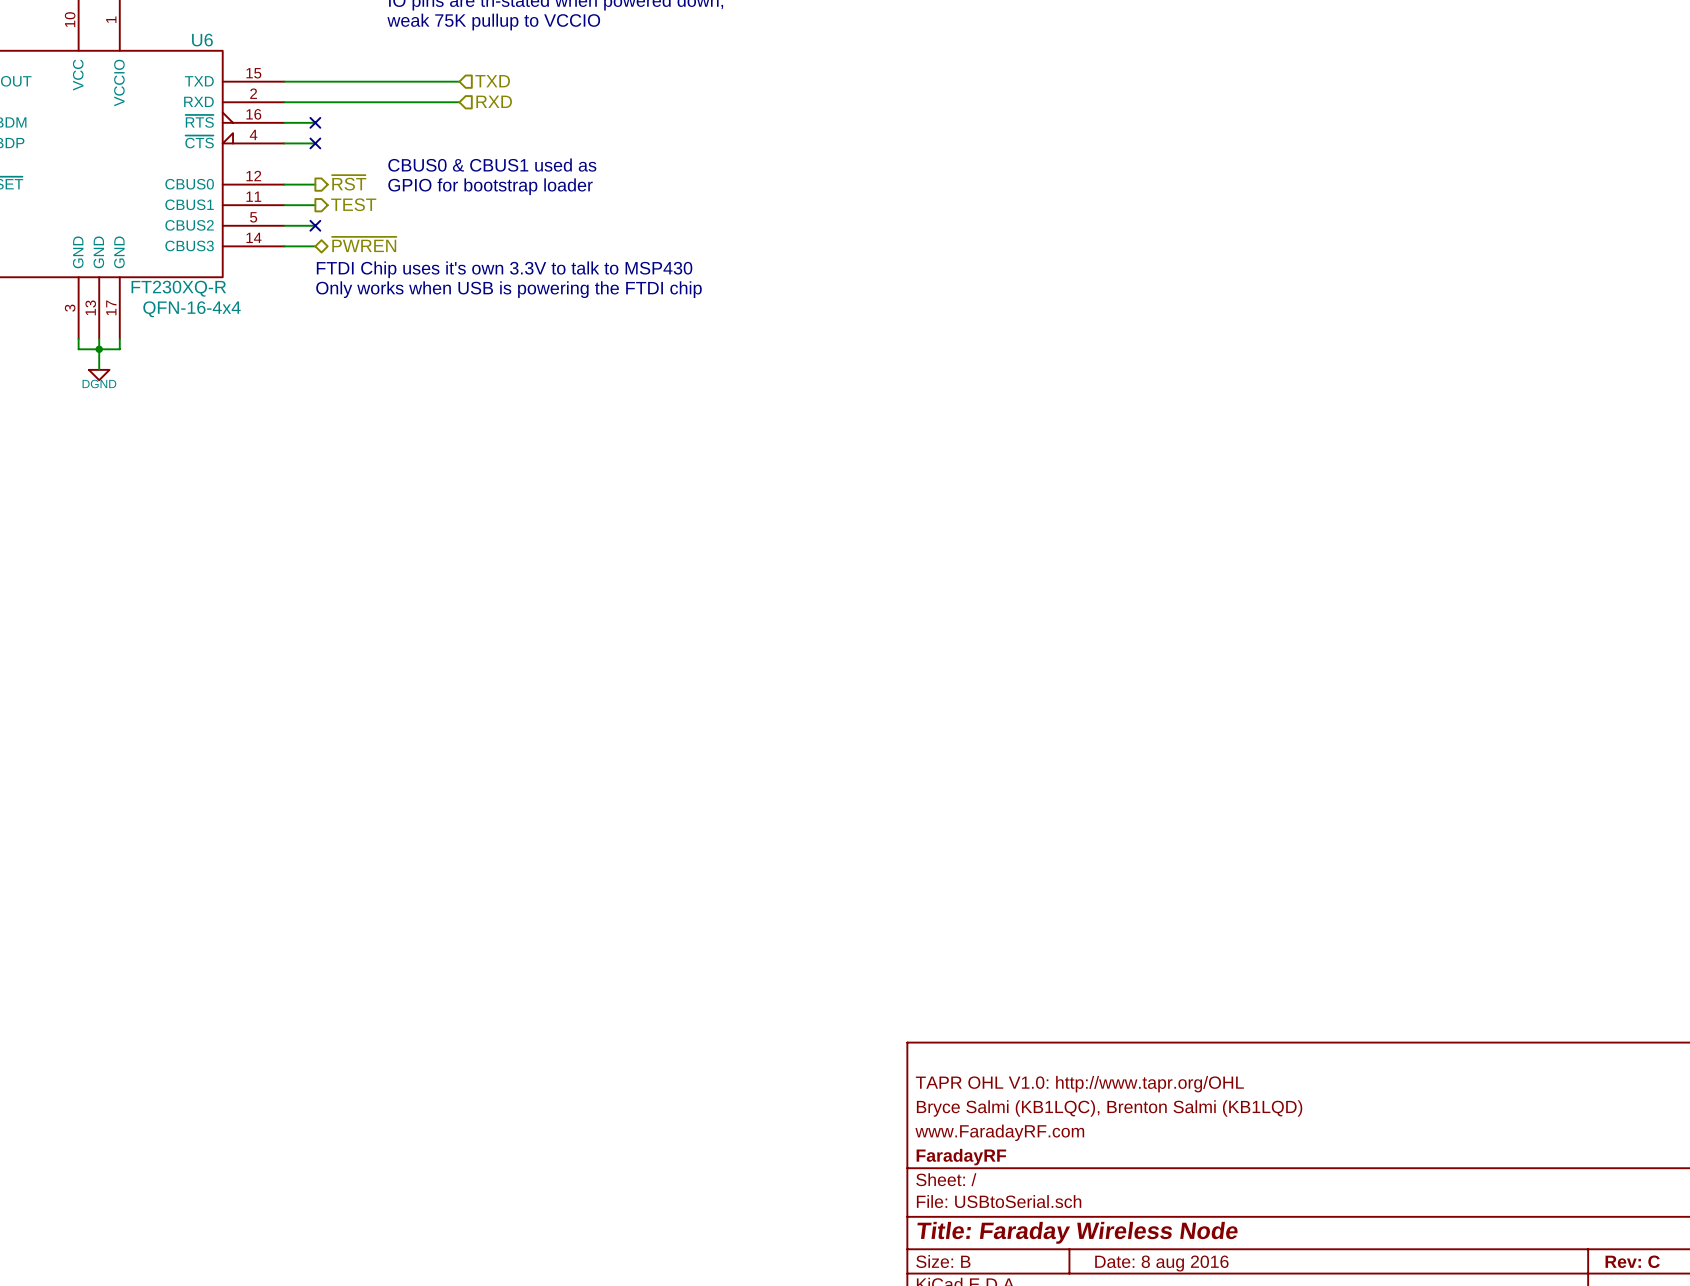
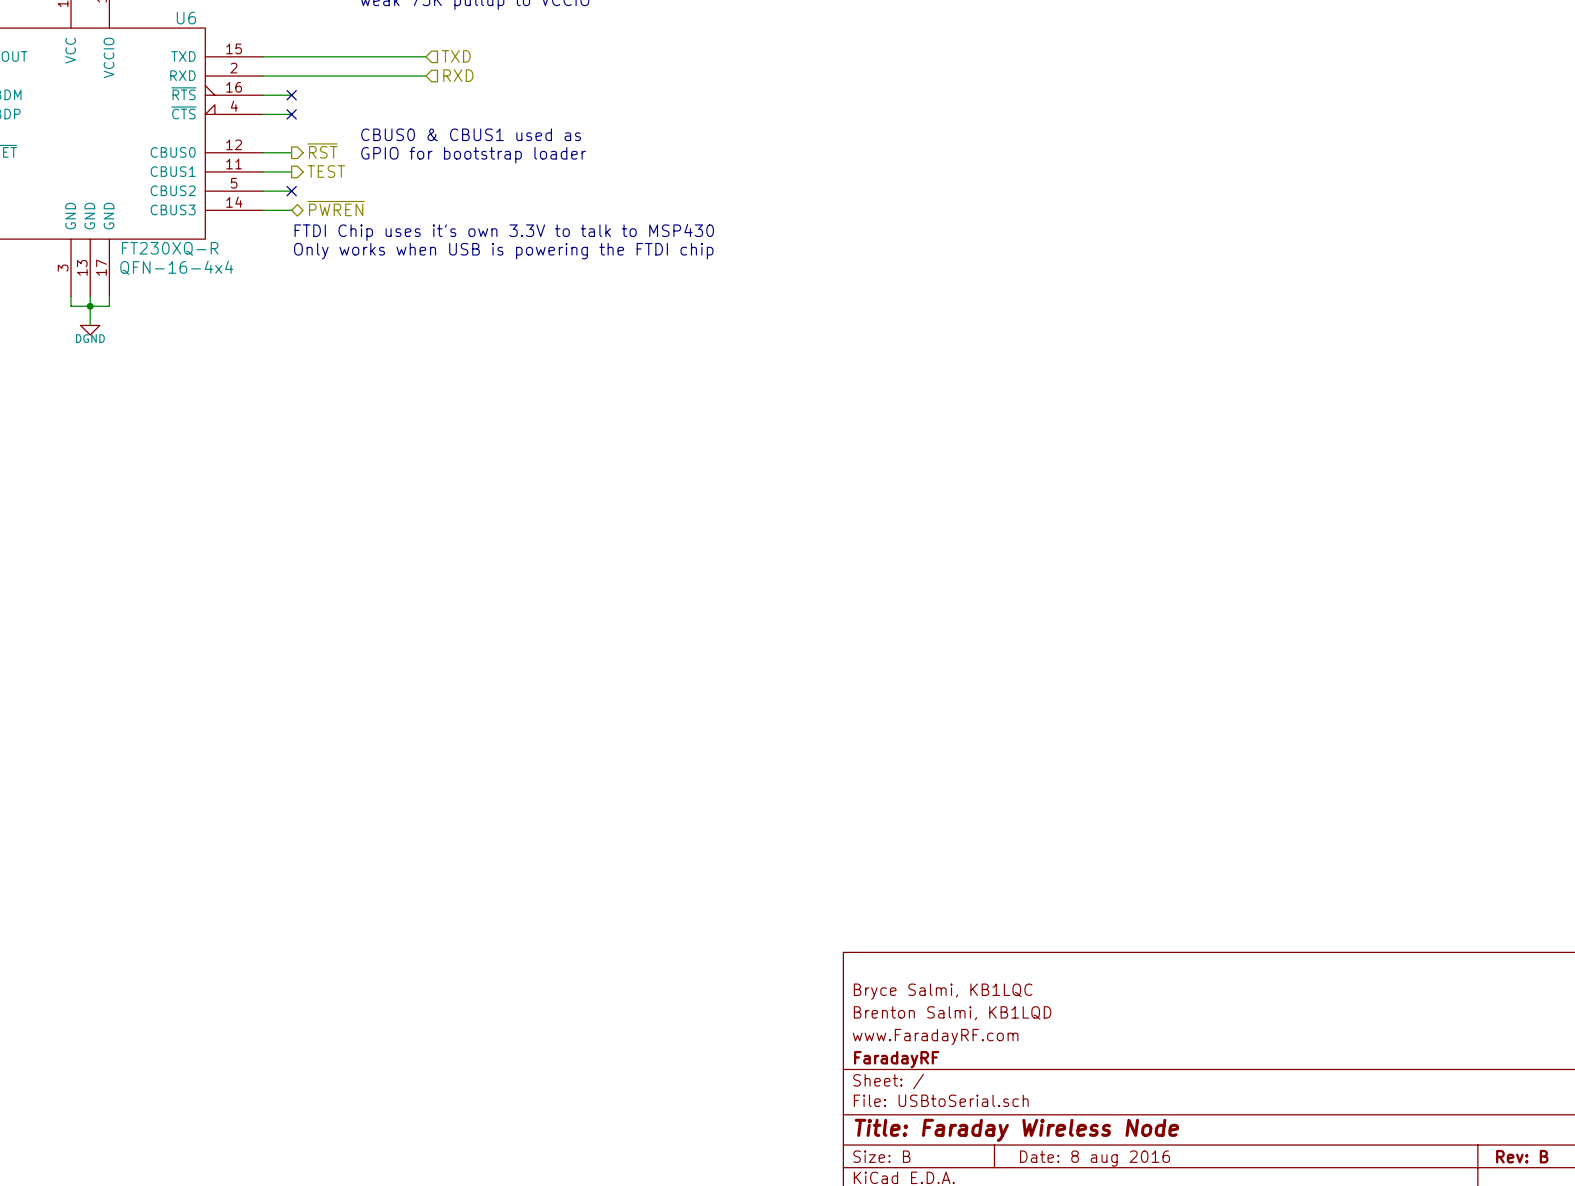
title block: TAPR OHL V1.0: http://www.tapr.org/OHL (1079, 1084) -> Bryce Salmi, KB1LQC (943, 991)
title block: Bryce Salmi (KB1LQC), Brenton Salmi (KB1LQD) (1109, 1108) -> Brenton Salmi, KB1LQD (952, 1013)
title block: Rev: C (1632, 1261) -> Rev: B (1522, 1156)

